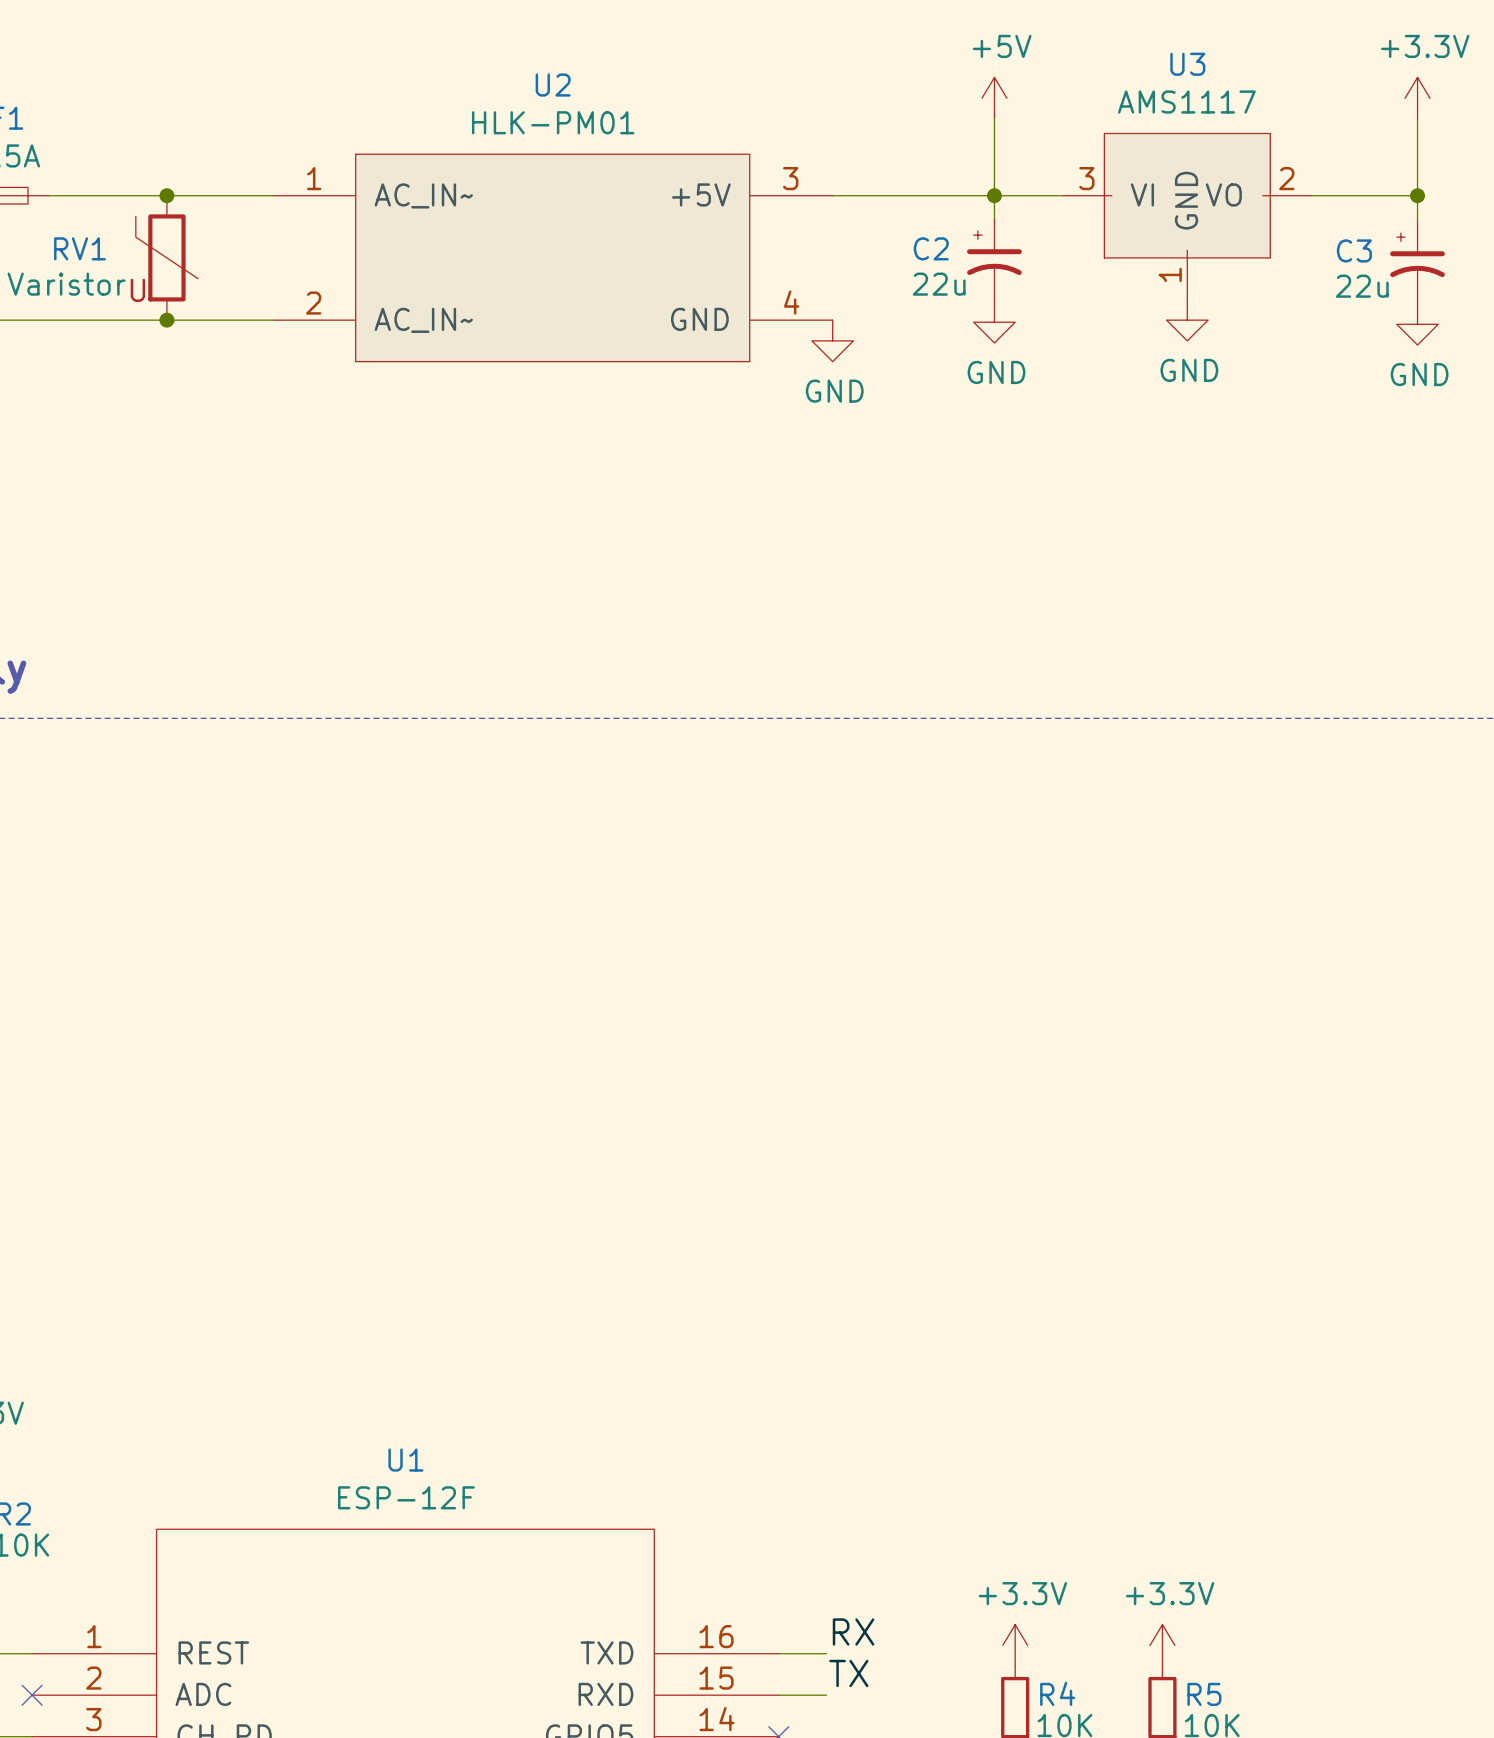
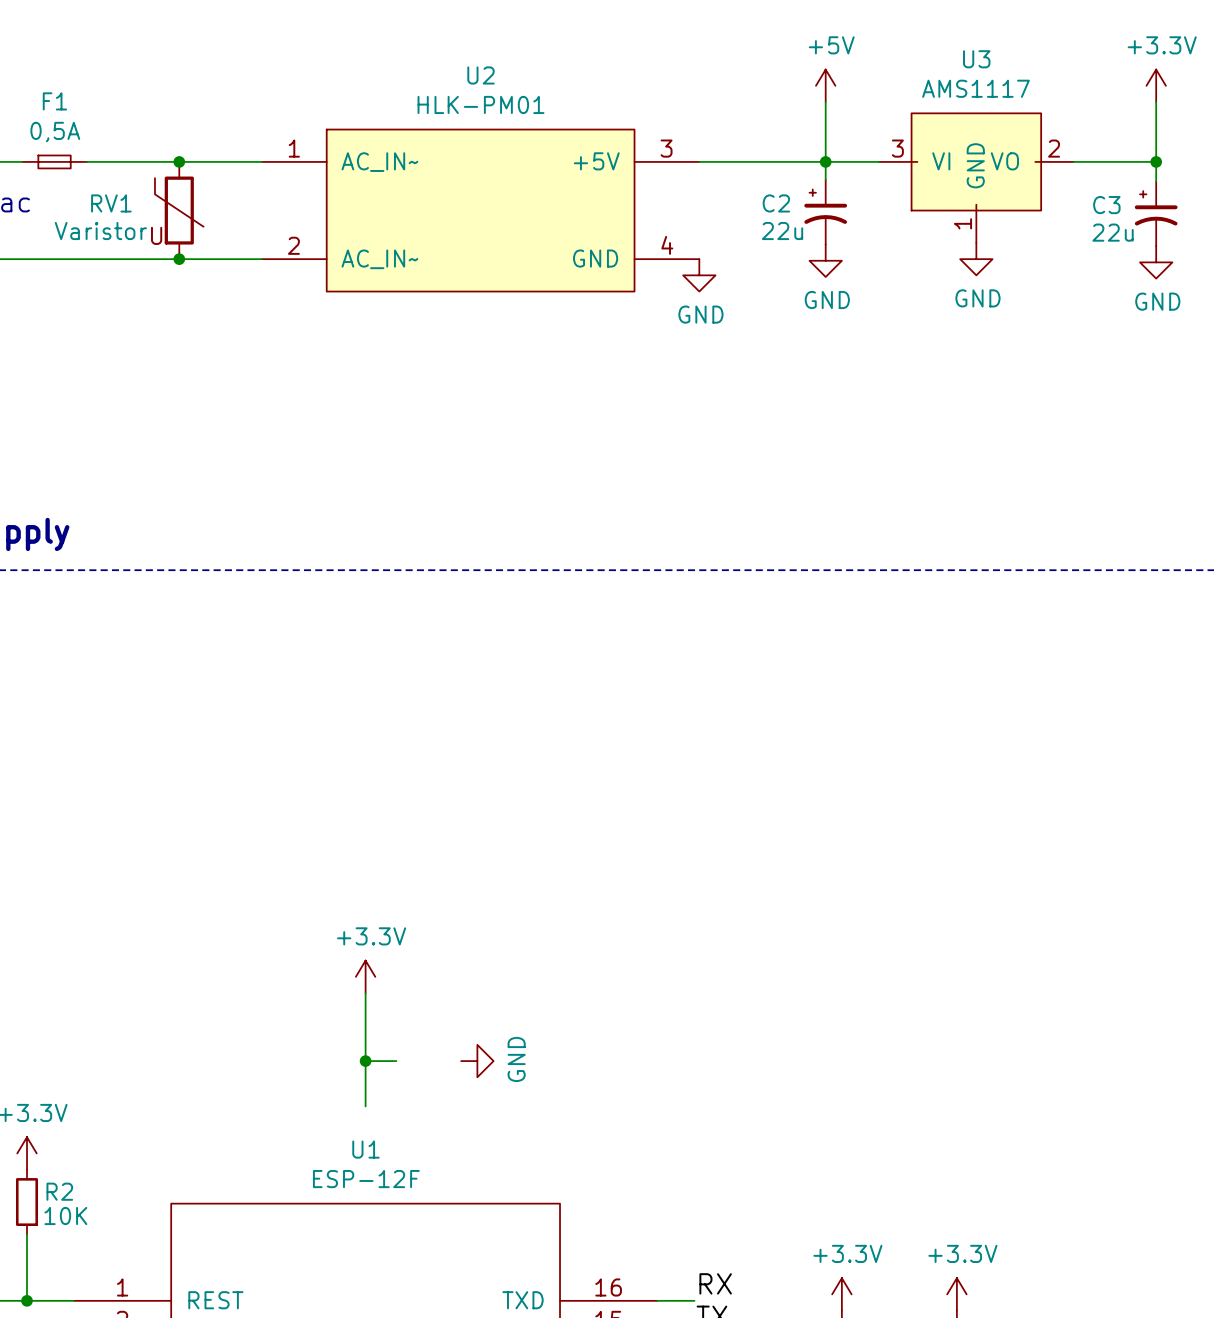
power symbol: none -> +3.3V (365, 976)
wire: none -> (365, 993) (365, 1106)
wire: none -> (365, 1061) (396, 1061)
junction: none -> (365, 1061)
power symbol: none -> GND (477, 1061)

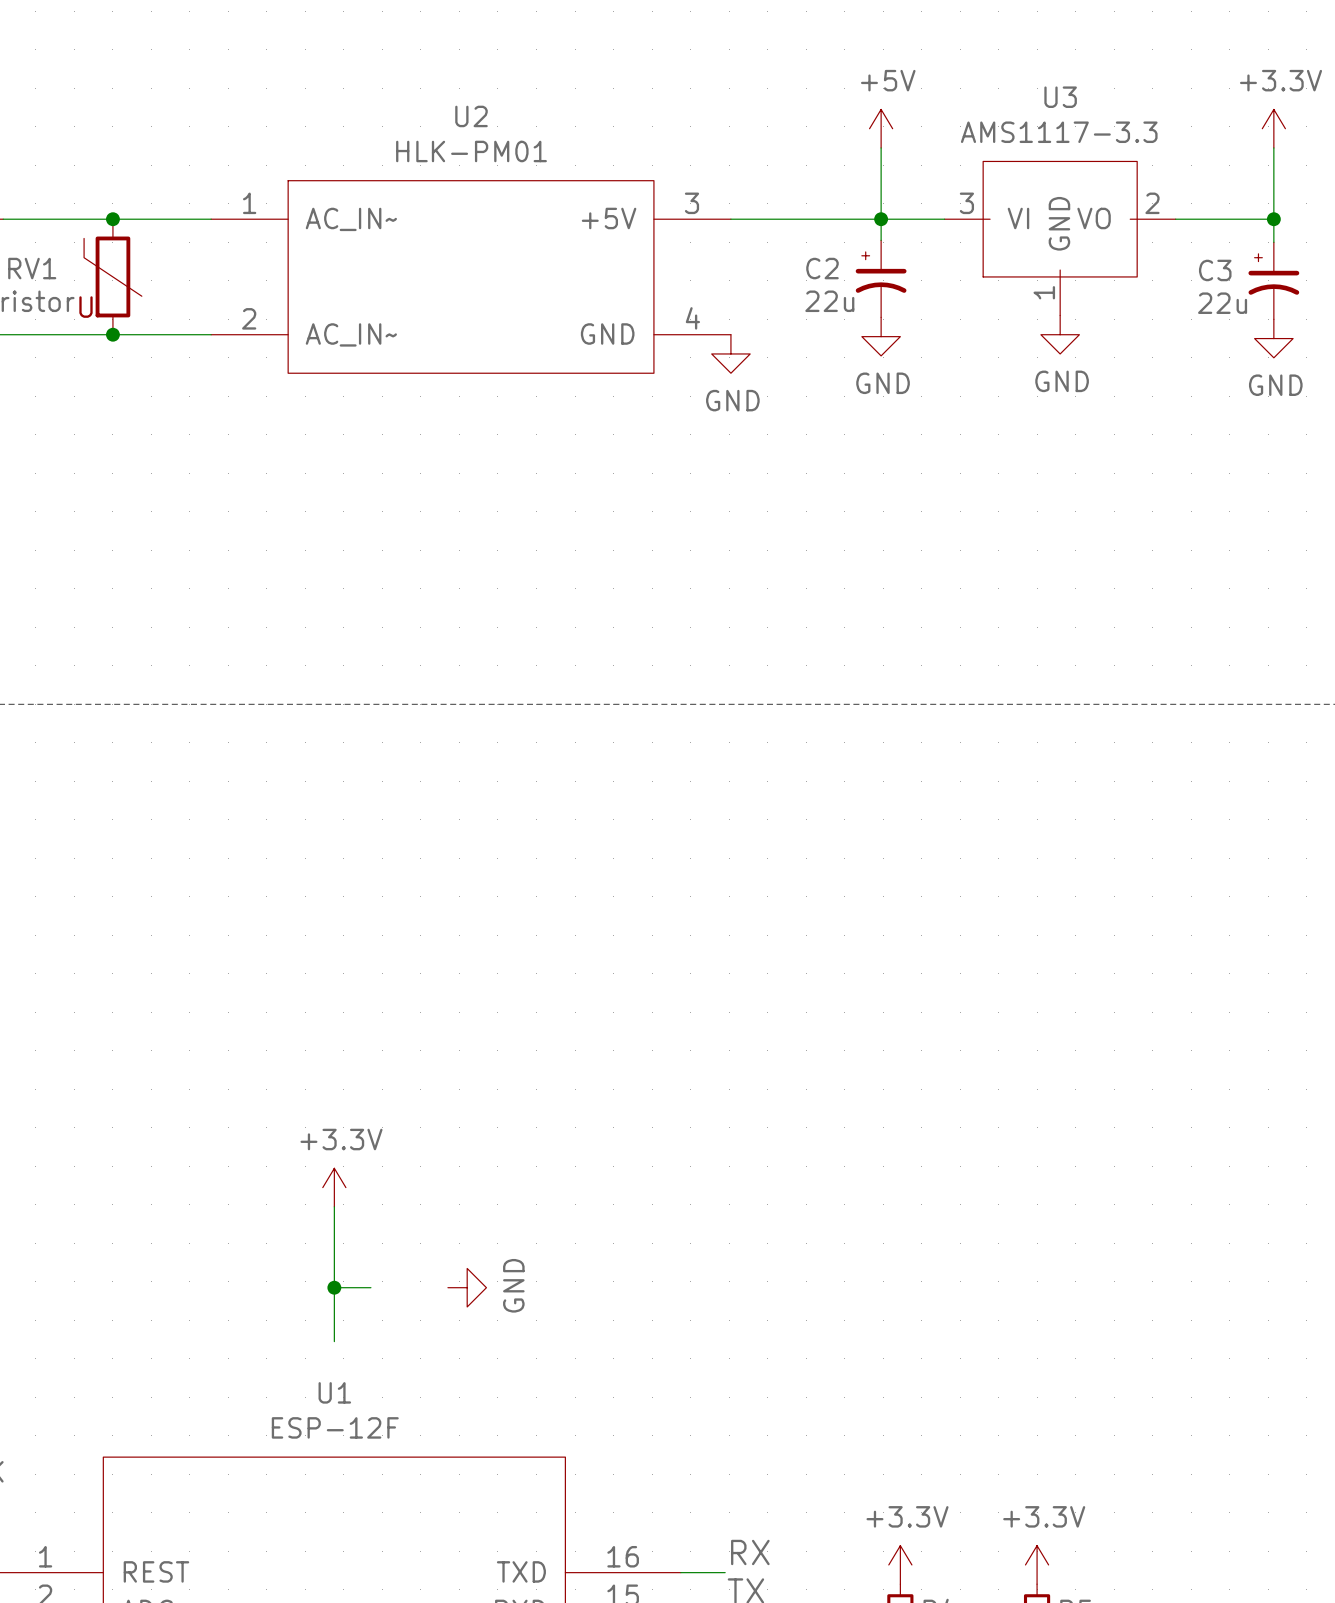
U3 value: AMS1117 (975, 88) -> AMS1117-3.3 (1059, 132)

